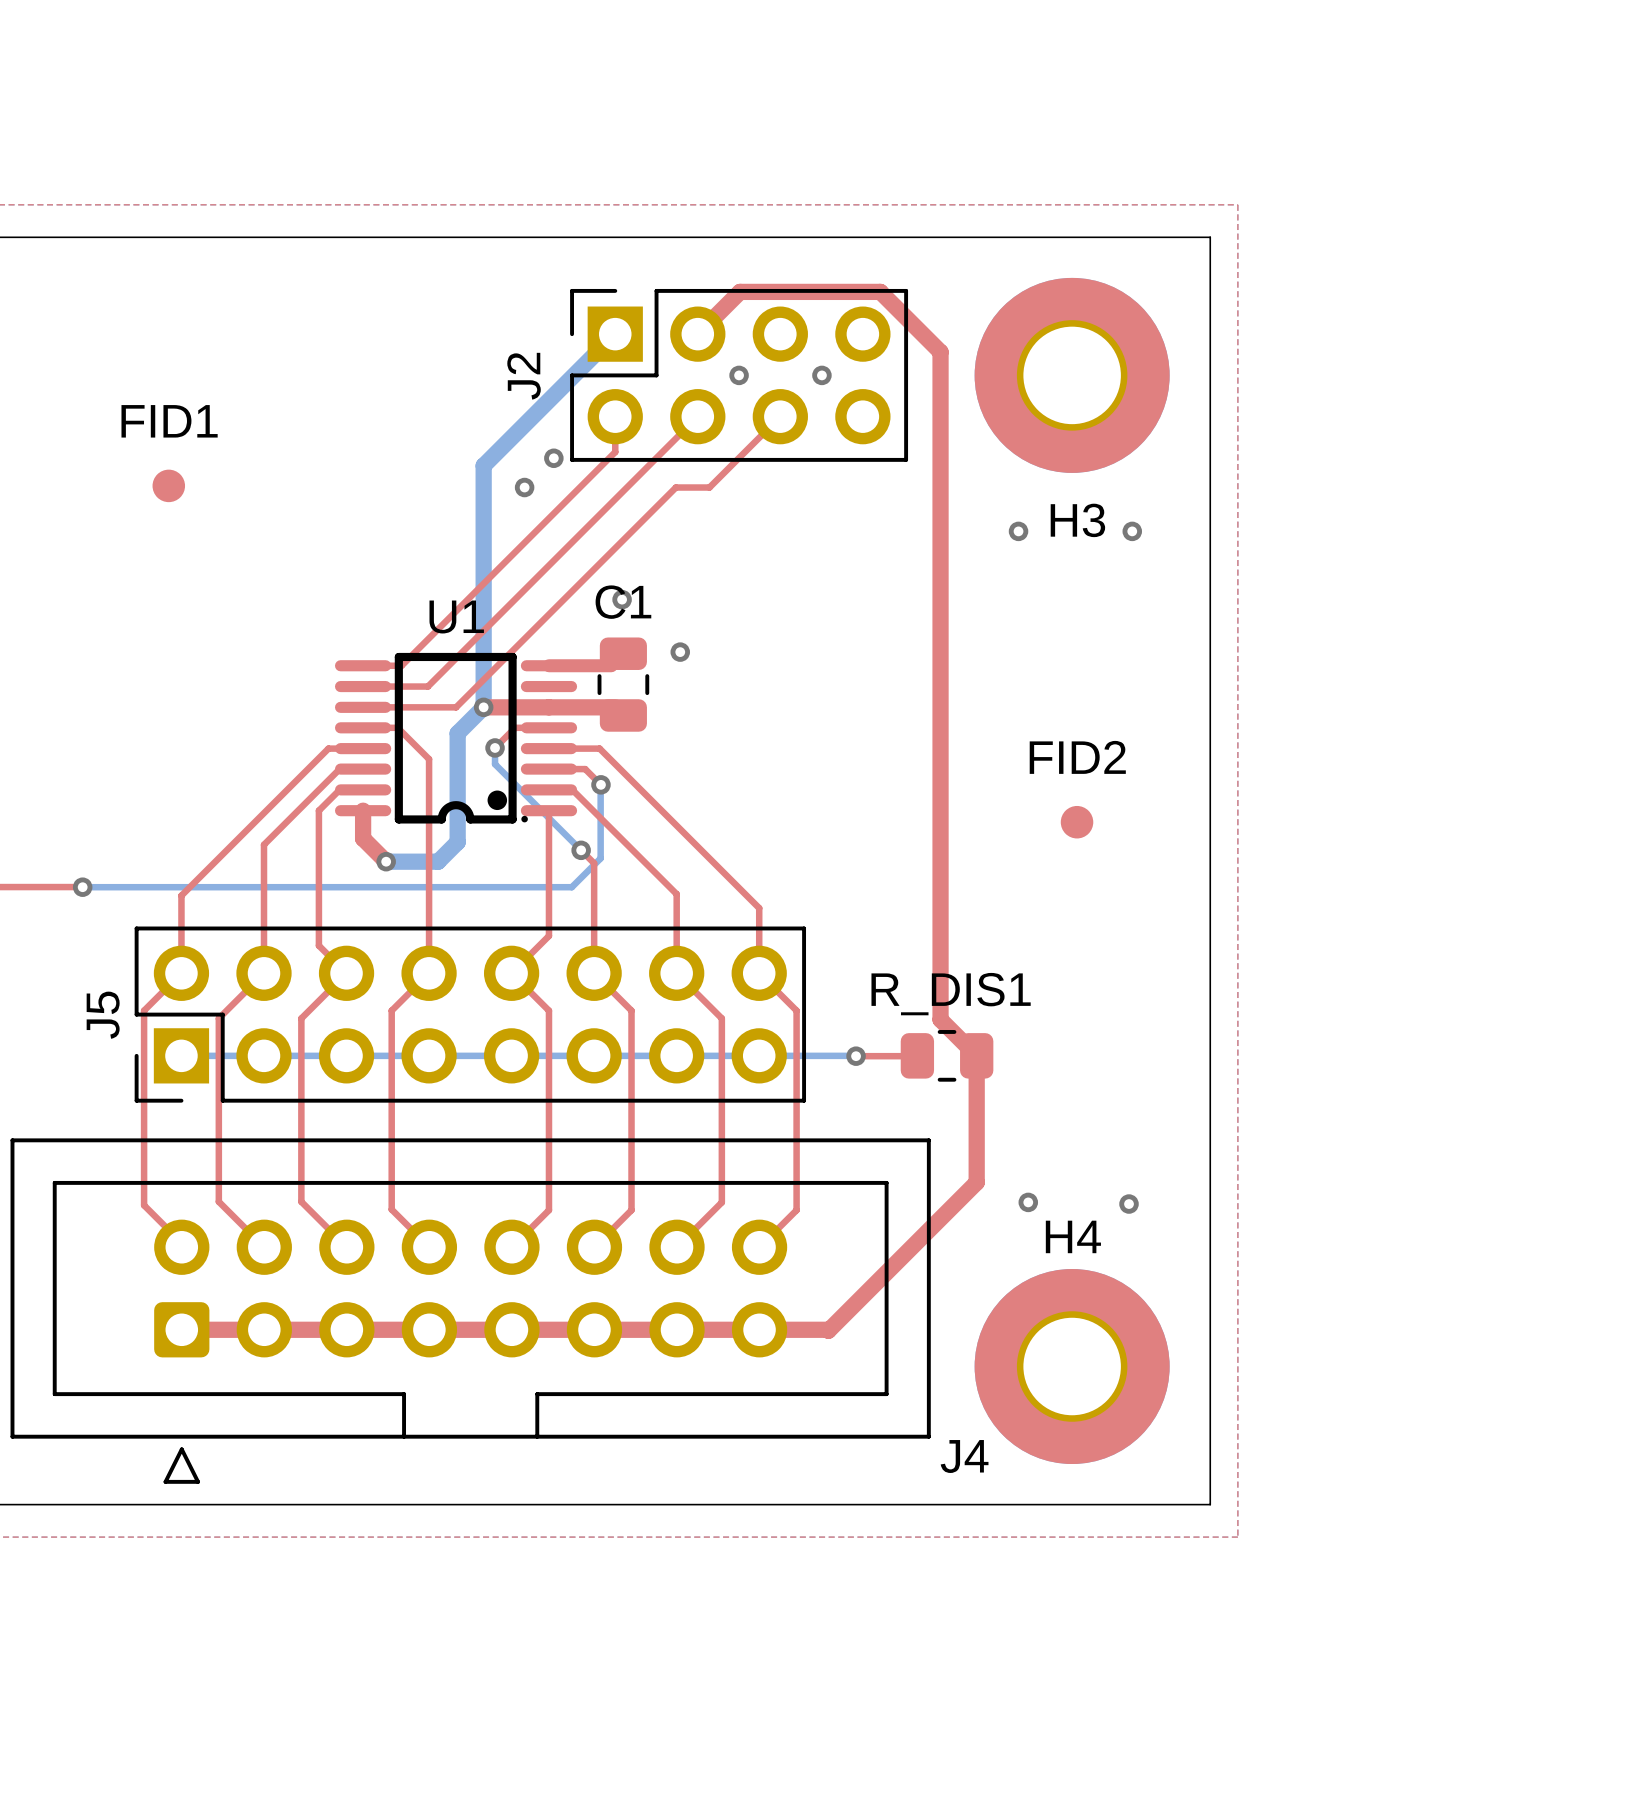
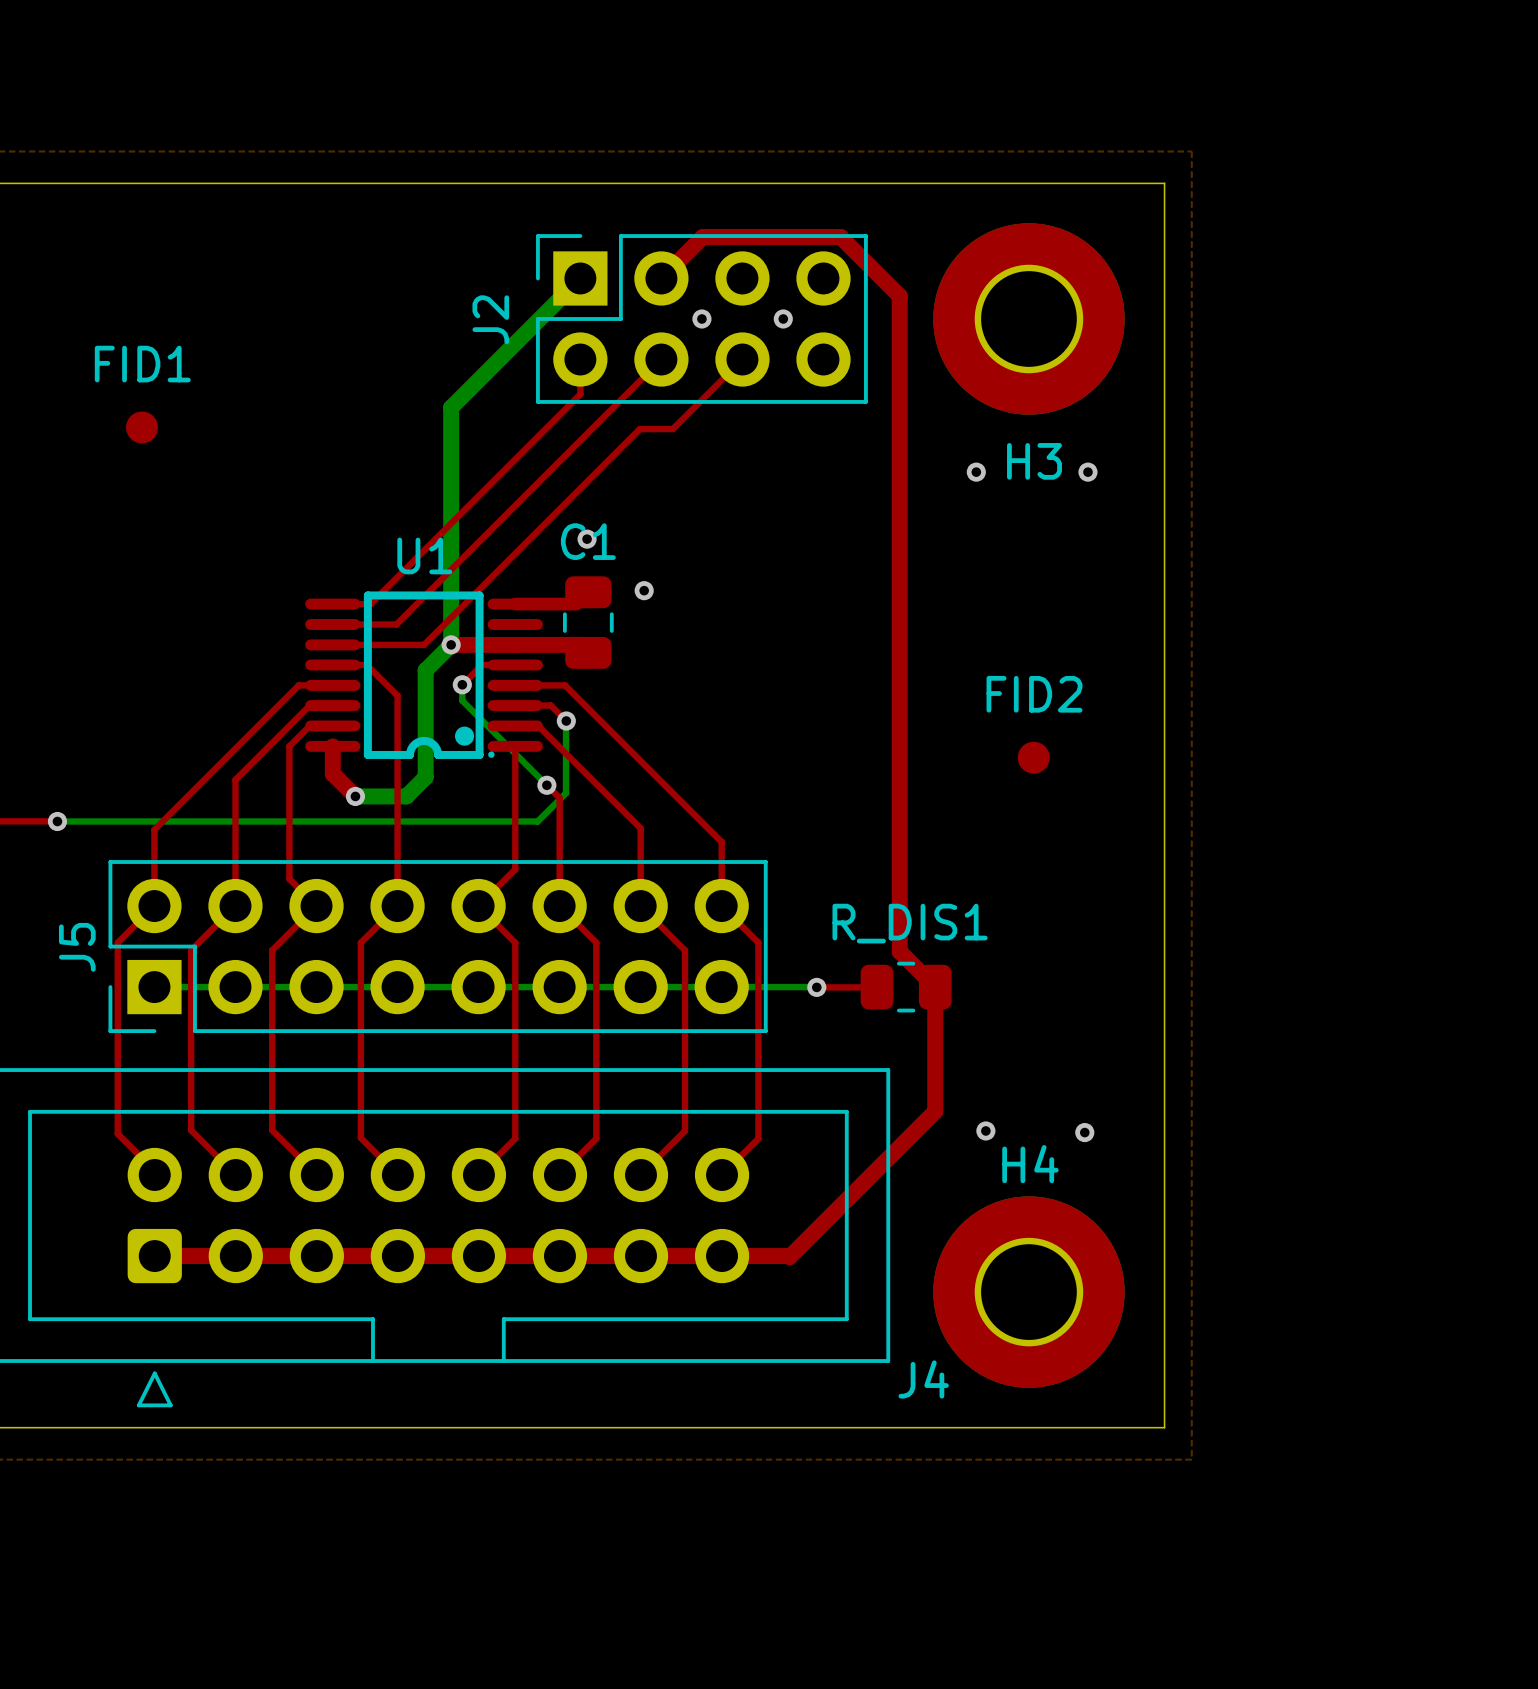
via: (553, 458) -> none
via: (524, 487) -> none

